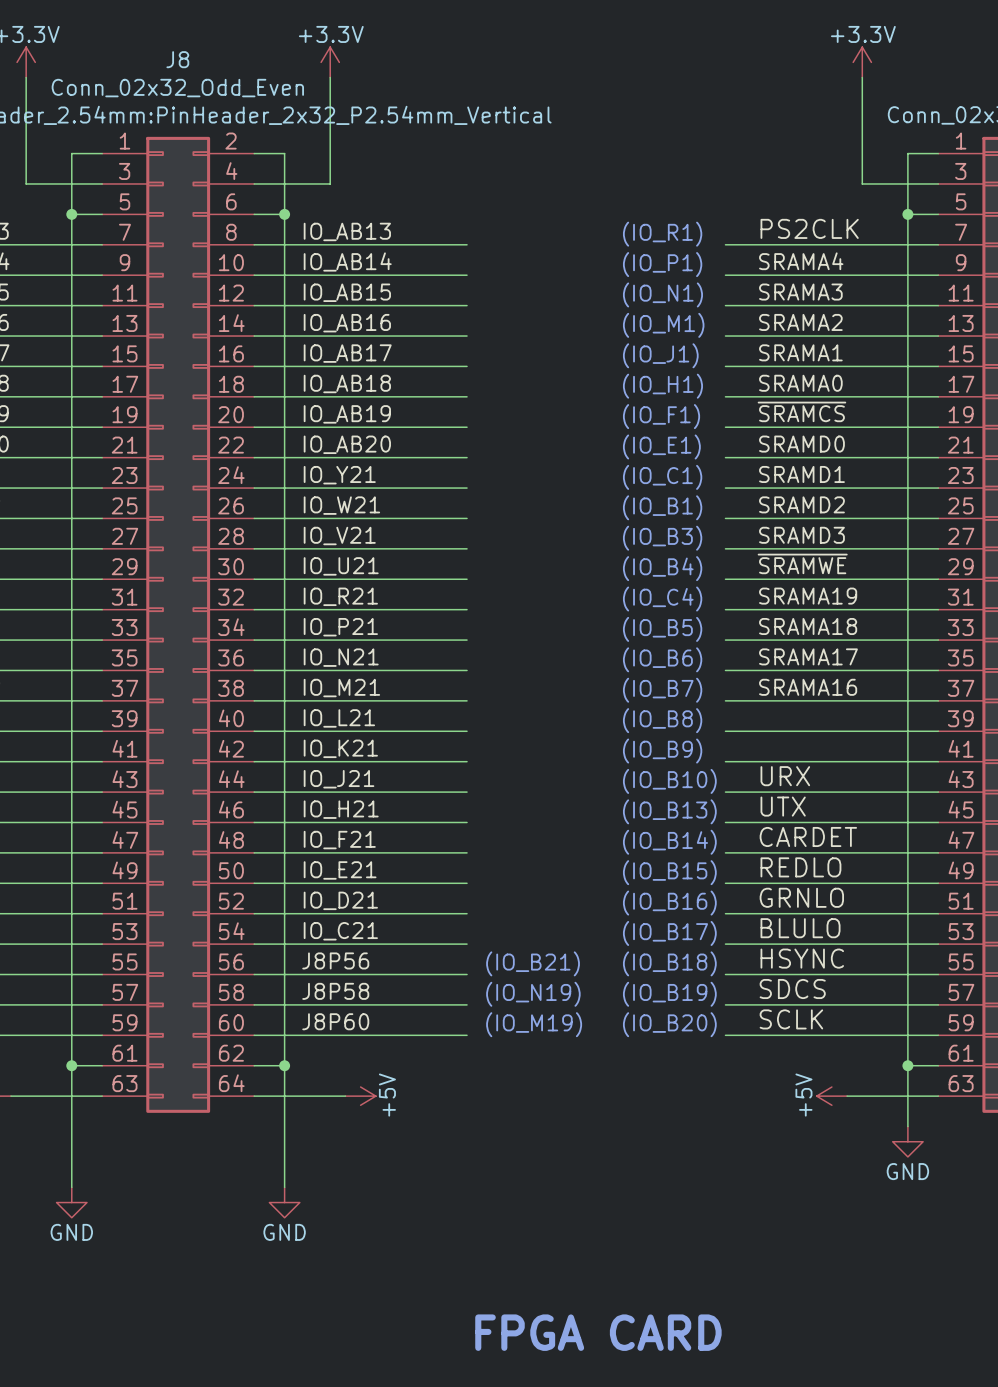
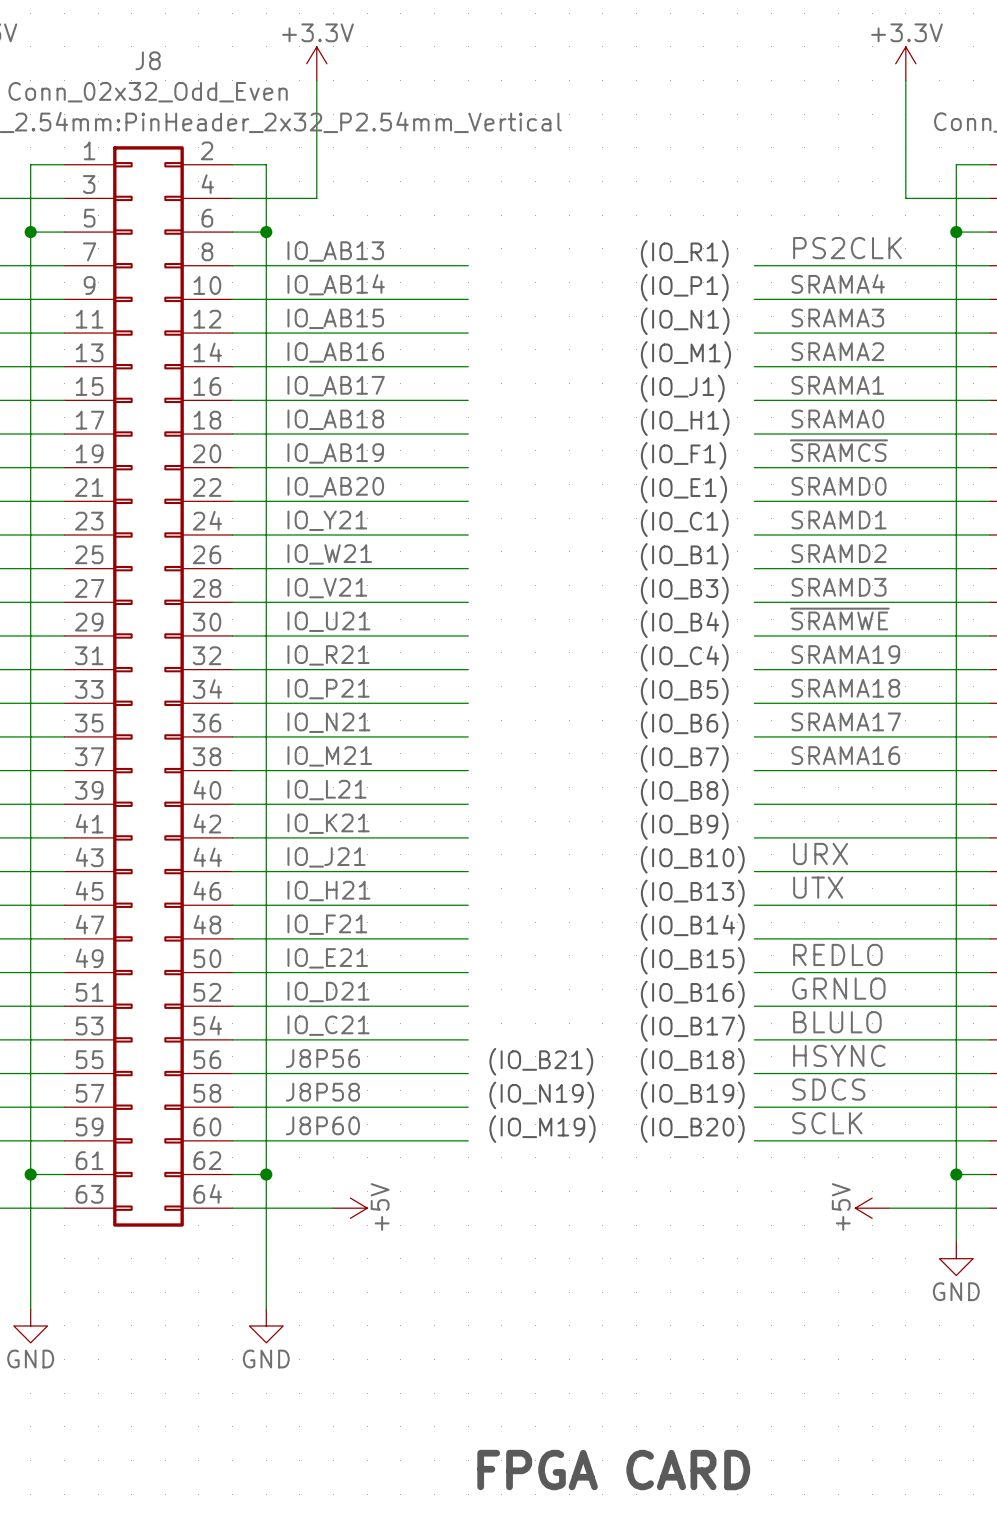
label: CARDET (808, 836) -> none

